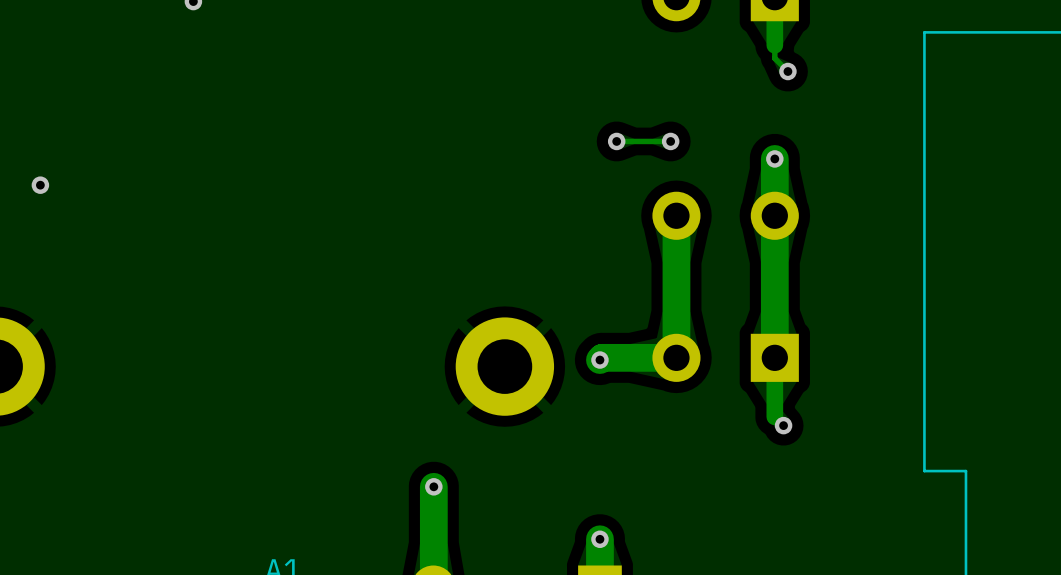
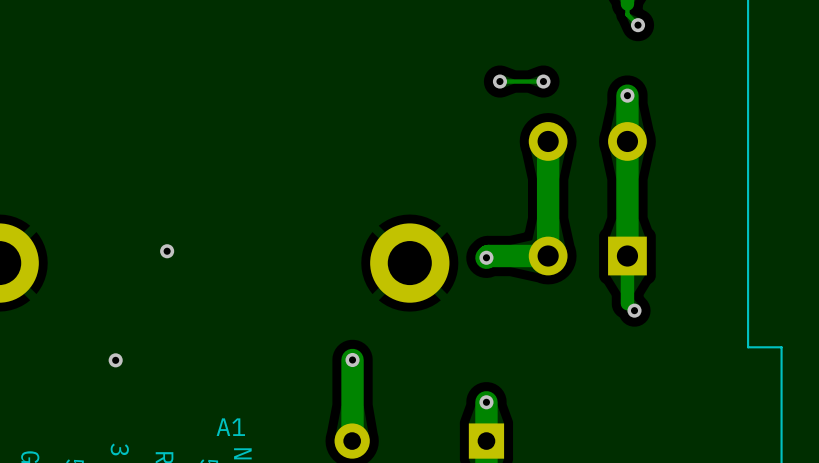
via: (40, 185) -> none
via: none -> (167, 251)
via: none -> (115, 360)

